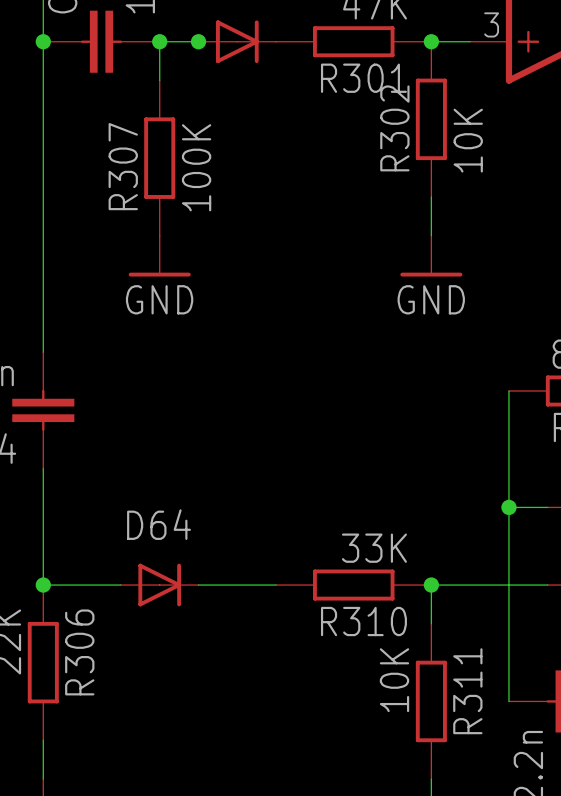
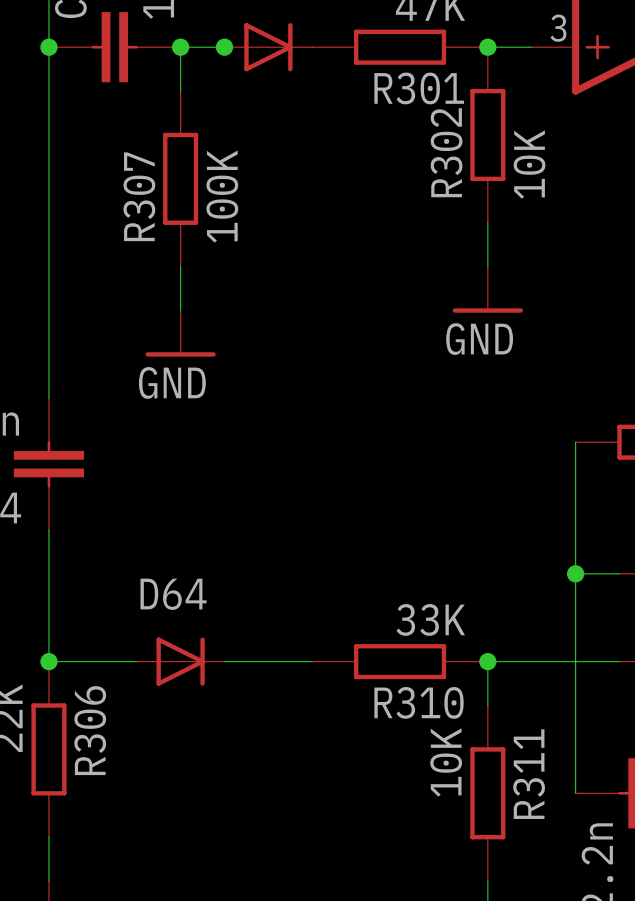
power symbol position: GND (159, 256) -> GND (180, 333)

